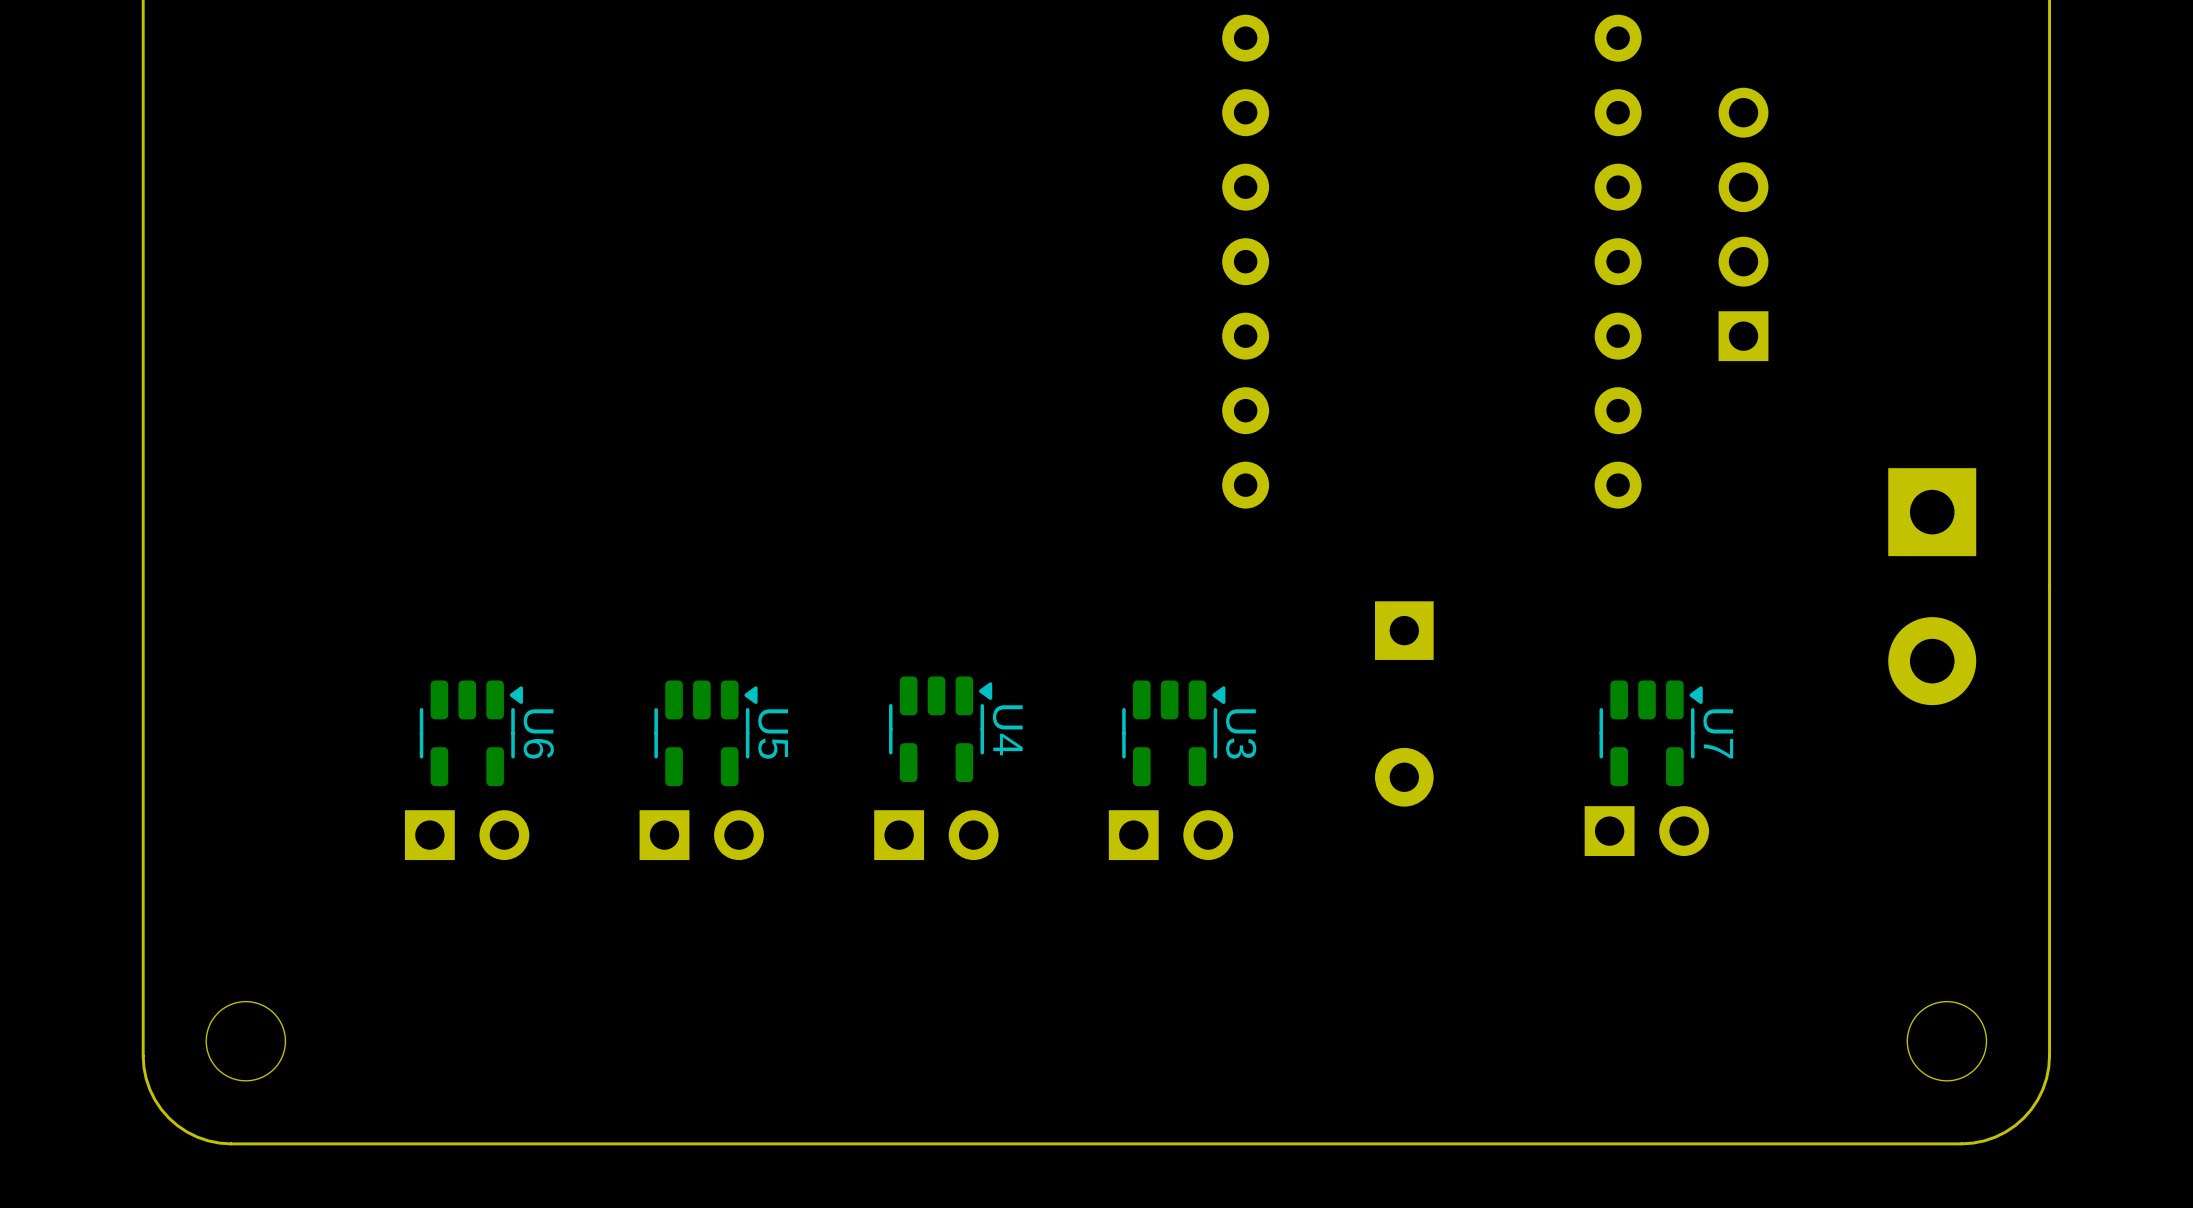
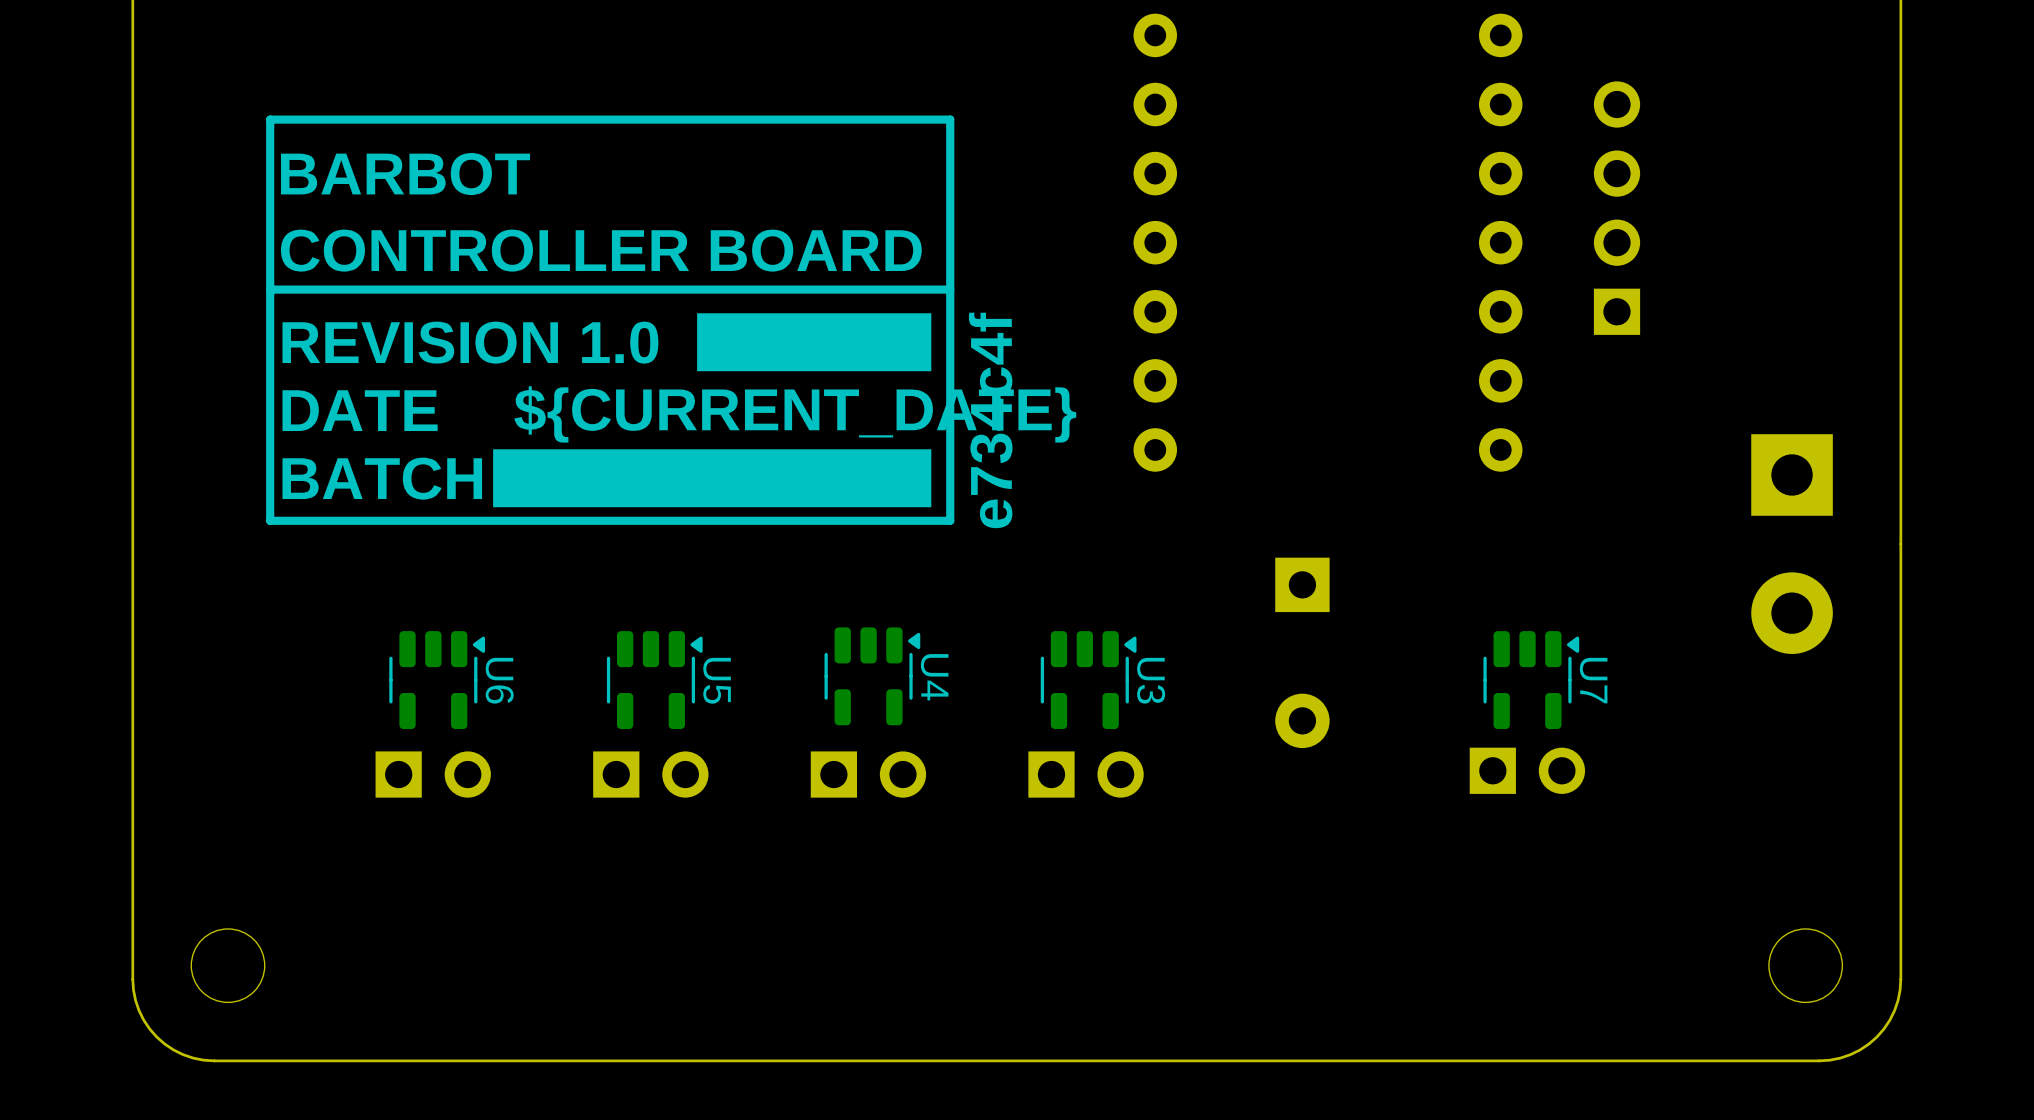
line: none -> (950, 119) (270, 119) (270, 520) (950, 520) (950, 119)
text: none -> BARBOT (405, 174)
text: none -> CONTROLLER BOARD (601, 250)
line: none -> (950, 289) (270, 289)
drawing: none -> [697, 313, 932, 372]
text: none -> REVISION 1.0 (470, 342)
text: none -> DATE (360, 410)
text: none -> ${CURRENT_DATE} (795, 414)
text: none -> e734c4f (990, 420)
drawing: none -> [493, 449, 932, 508]
text: none -> BATCH (382, 478)

